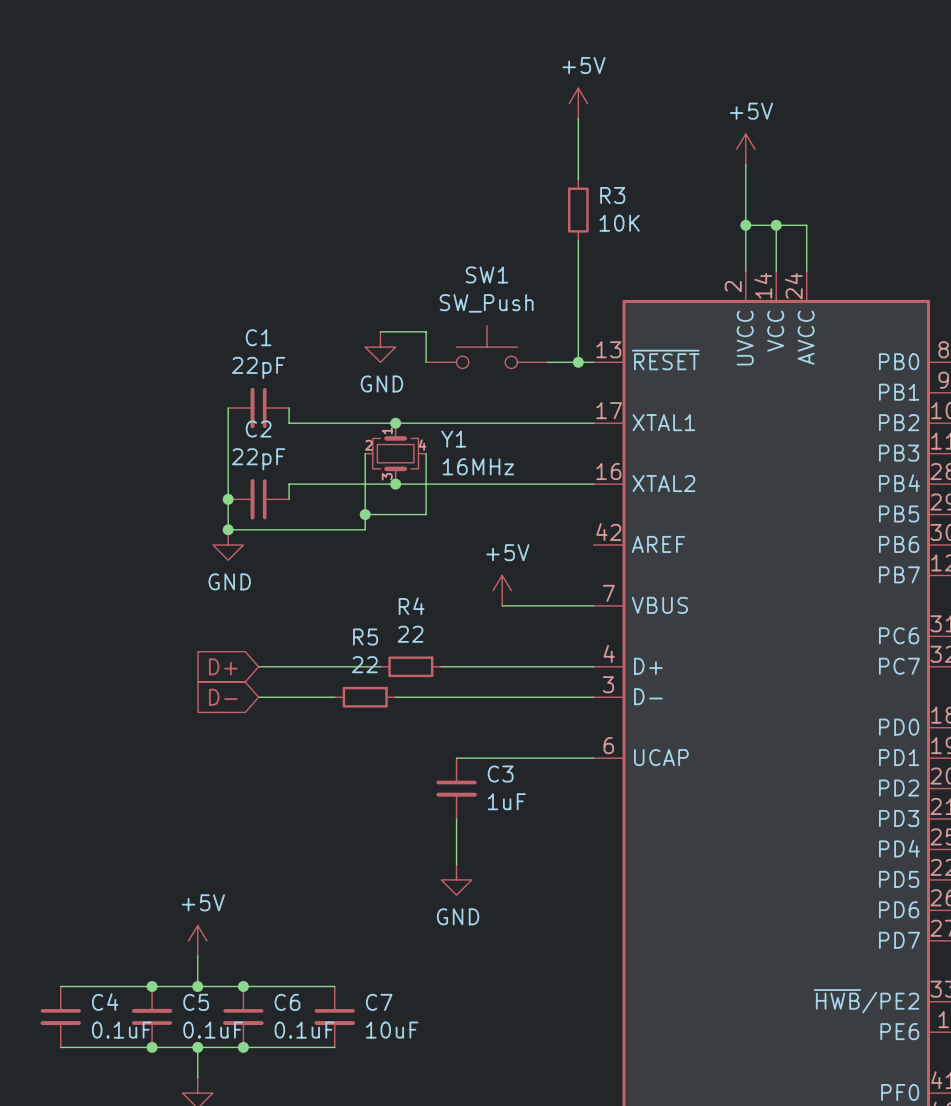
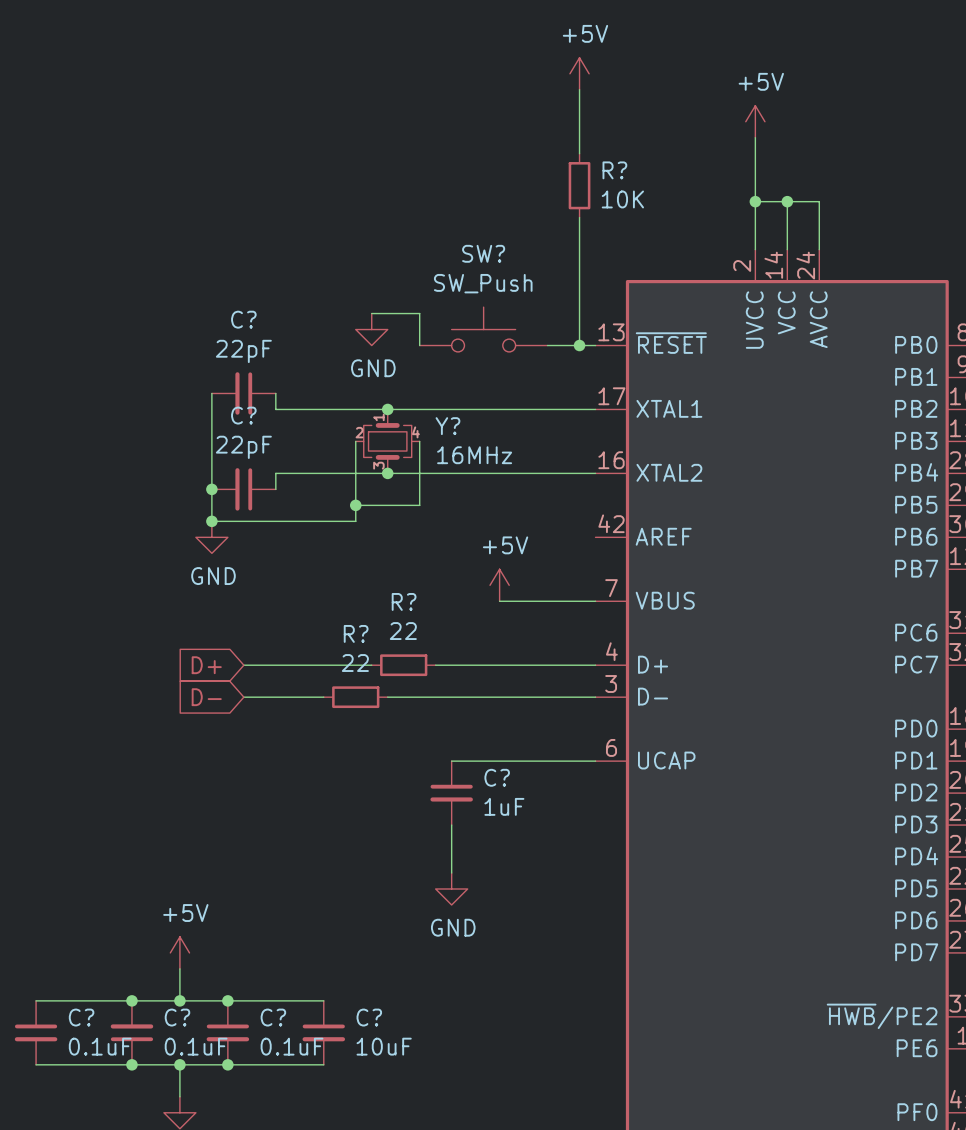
R3 name: R3 (612, 195) -> R? (614, 170)
SW1 name: SW1 (486, 274) -> SW? (483, 253)
C1 name: C1 (258, 337) -> C? (243, 319)
C2 name: C2 (258, 429) -> C? (243, 415)
Y1 name: Y1 (453, 439) -> Y? (447, 426)
R4 name: R4 (411, 606) -> R? (404, 601)
R5 name: R5 (365, 637) -> R? (356, 633)
C3 name: C3 (500, 774) -> C? (497, 777)
C4 name: C4 (105, 1002) -> C? (81, 1017)
C5 name: C5 (196, 1002) -> C? (177, 1017)
C6 name: C6 (287, 1002) -> C? (273, 1017)
C7 name: C7 (379, 1002) -> C? (369, 1017)

